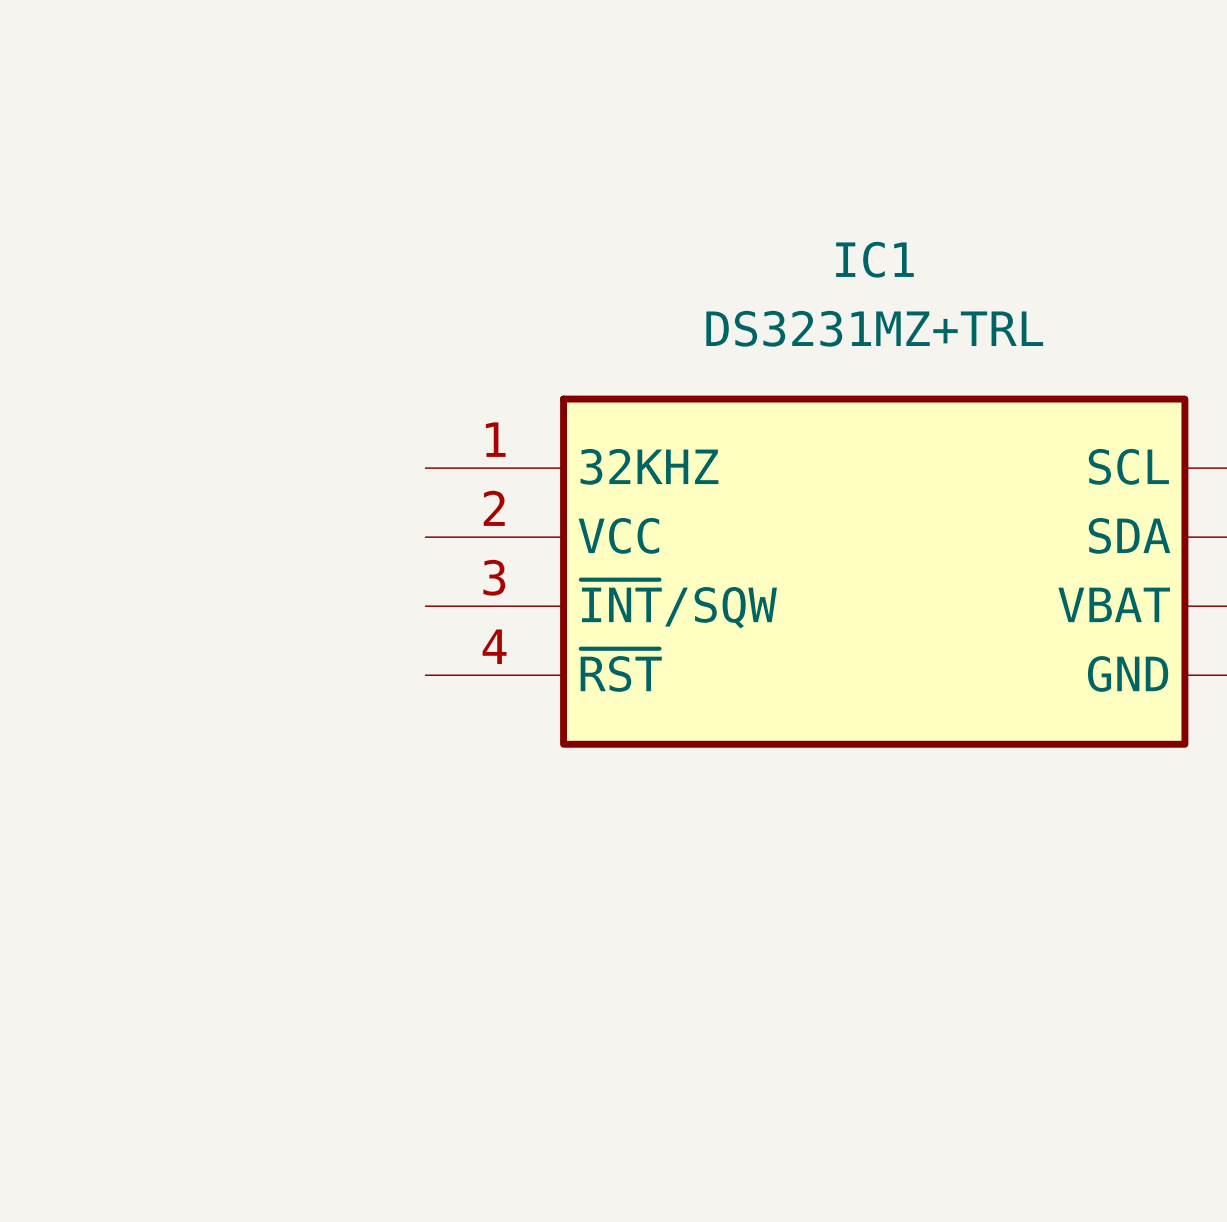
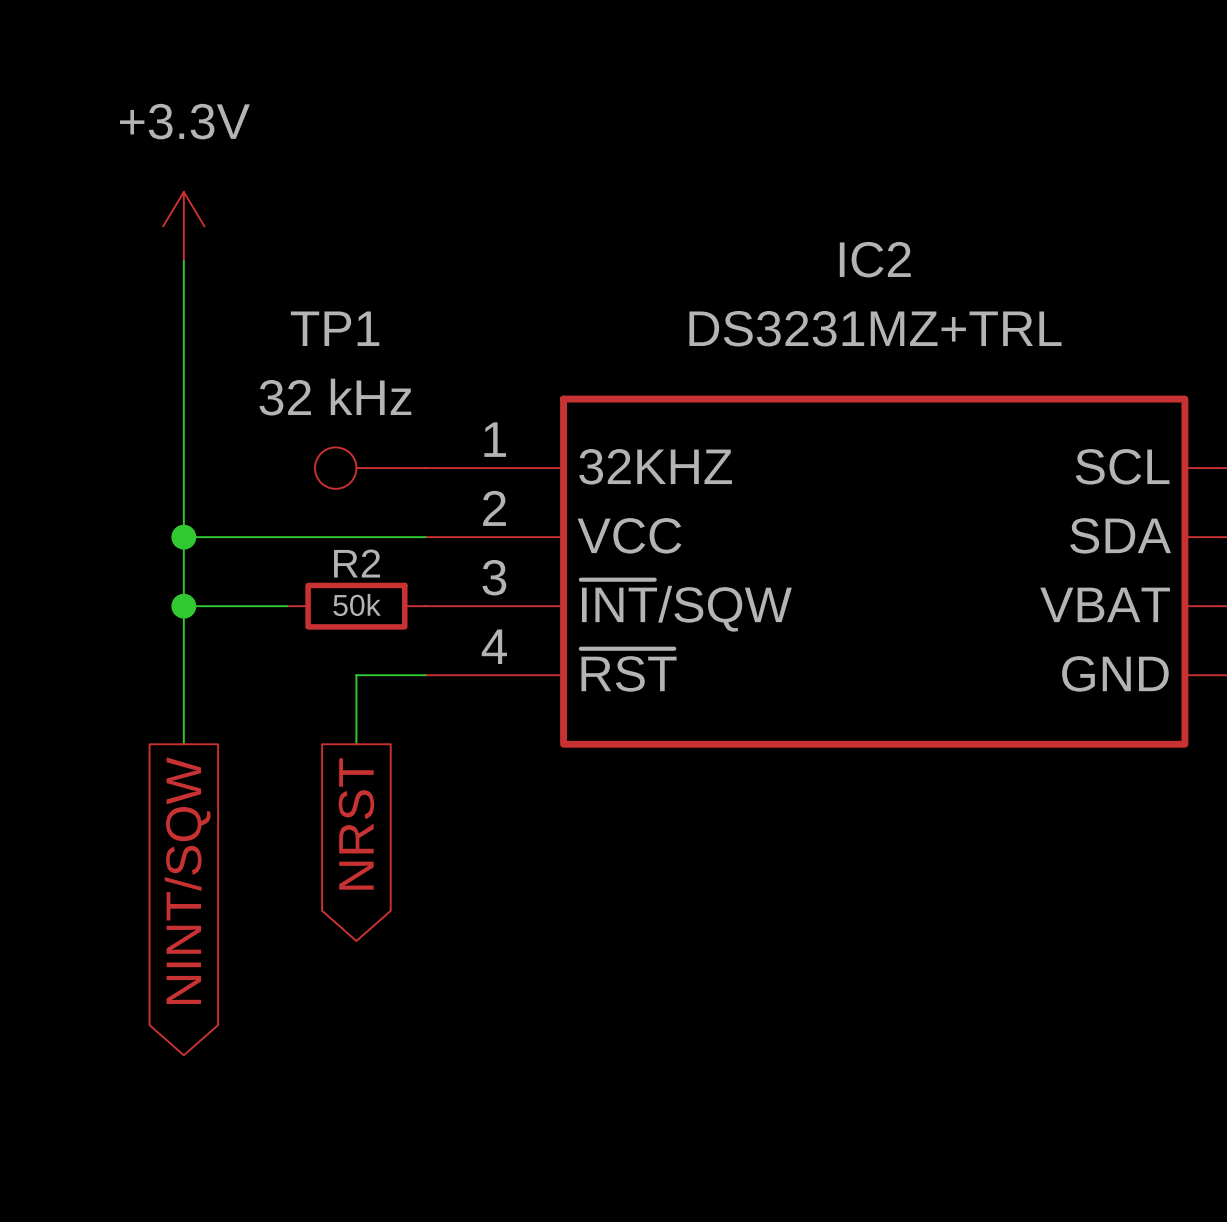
power symbol: none -> +3.3V (183, 226)
IC1 name: IC1 (874, 259) -> IC2 (875, 259)
wire: none -> (183, 260) (183, 744)
TP1: none -> 32 kHz (370, 468)
wire: none -> (183, 537) (425, 537)
junction: none -> (183, 537)
wire: none -> (183, 606) (287, 606)
junction: none -> (183, 606)
R2: none -> 50k (356, 606)
wire: none -> (425, 675) (356, 675) (356, 744)
global label: none -> NRST (356, 824)
global label: none -> NINT/SQW (187, 880)

